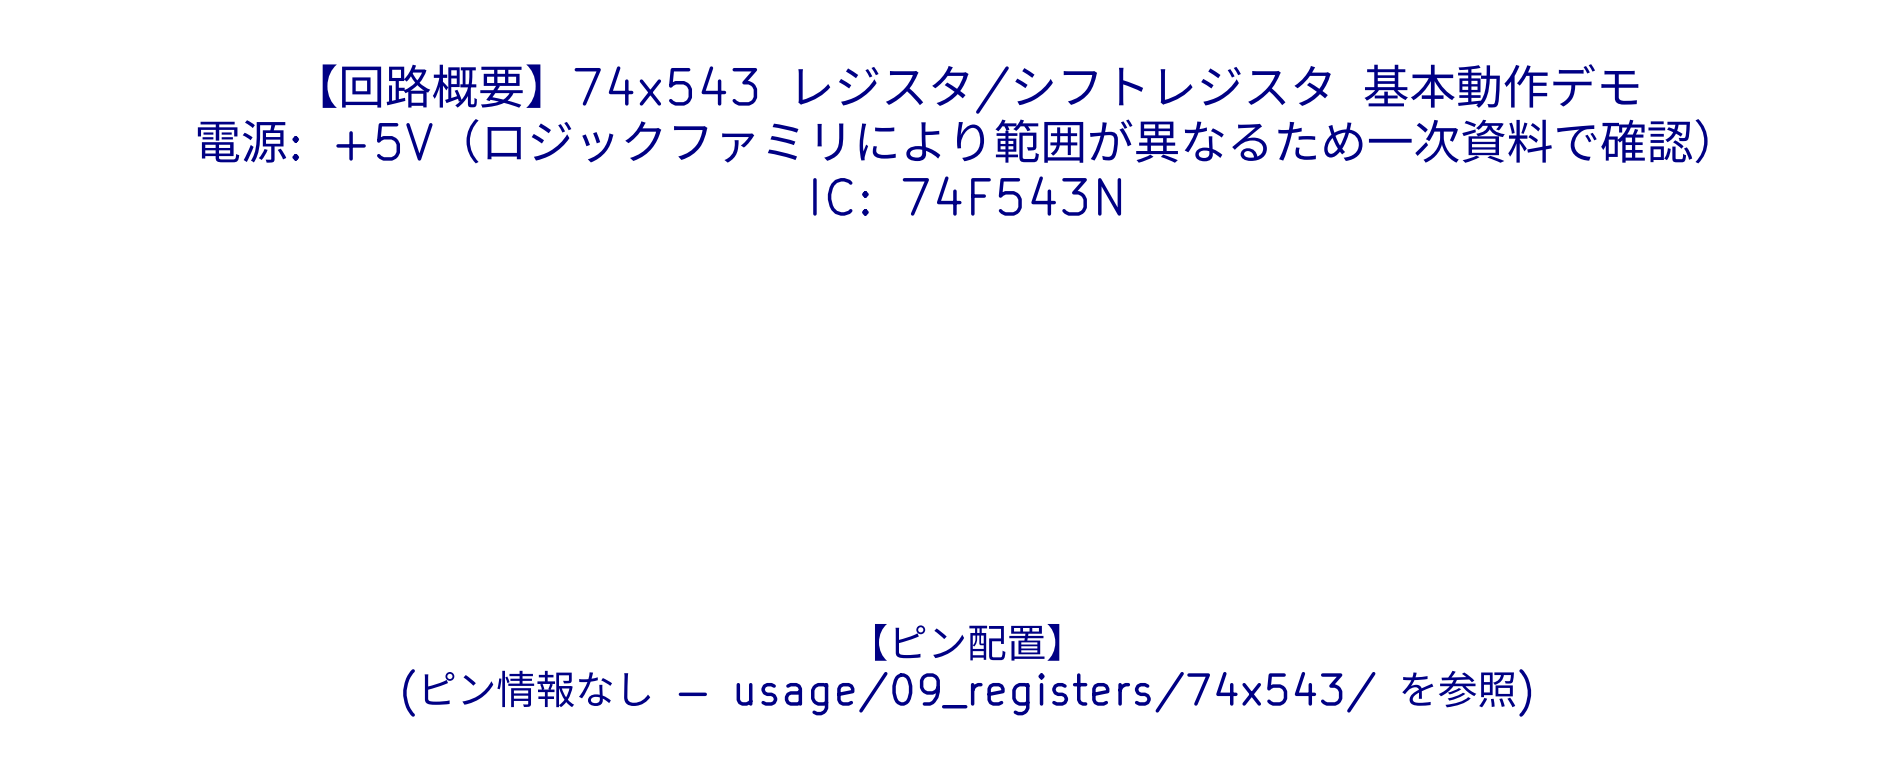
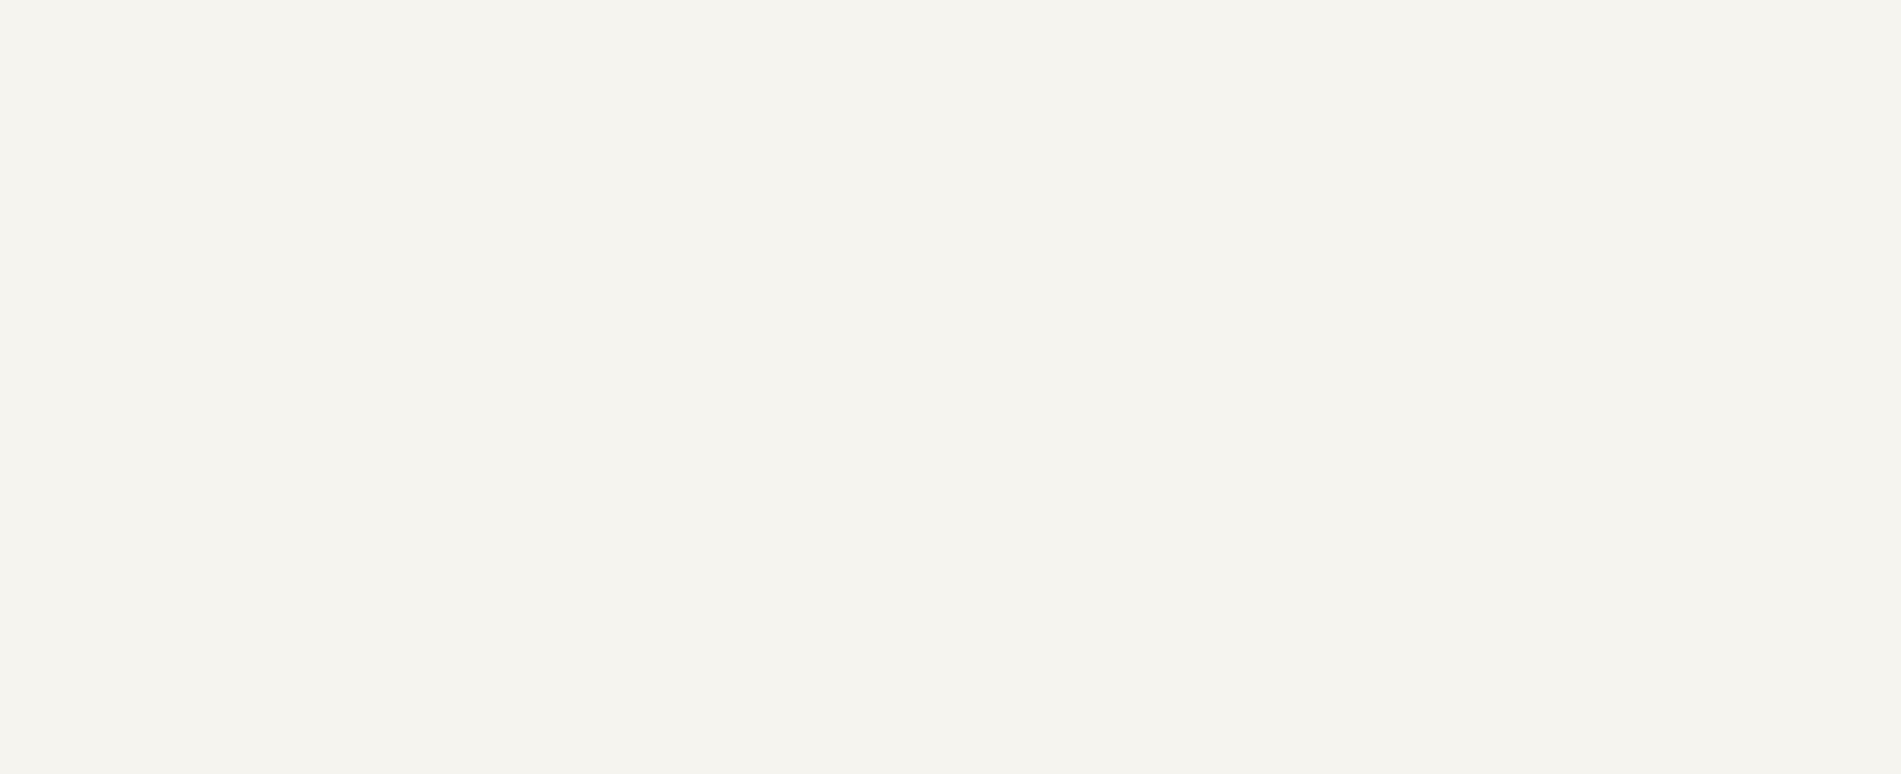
text: 【回路概要】74x543 レジスタ/シフトレジスタ 基本動作デモ (980, 88) -> none
text: 電源: +5V（ロジックファミリにより範囲が異なるため一次資料で確認） (952, 141) -> none
text: IC: 74F543N (967, 196) -> none
text: 【ピン配置】 (967, 642) -> none
text: (ピン情報なし — usage/09_registers/74x543/ を参照) (967, 692) -> none

